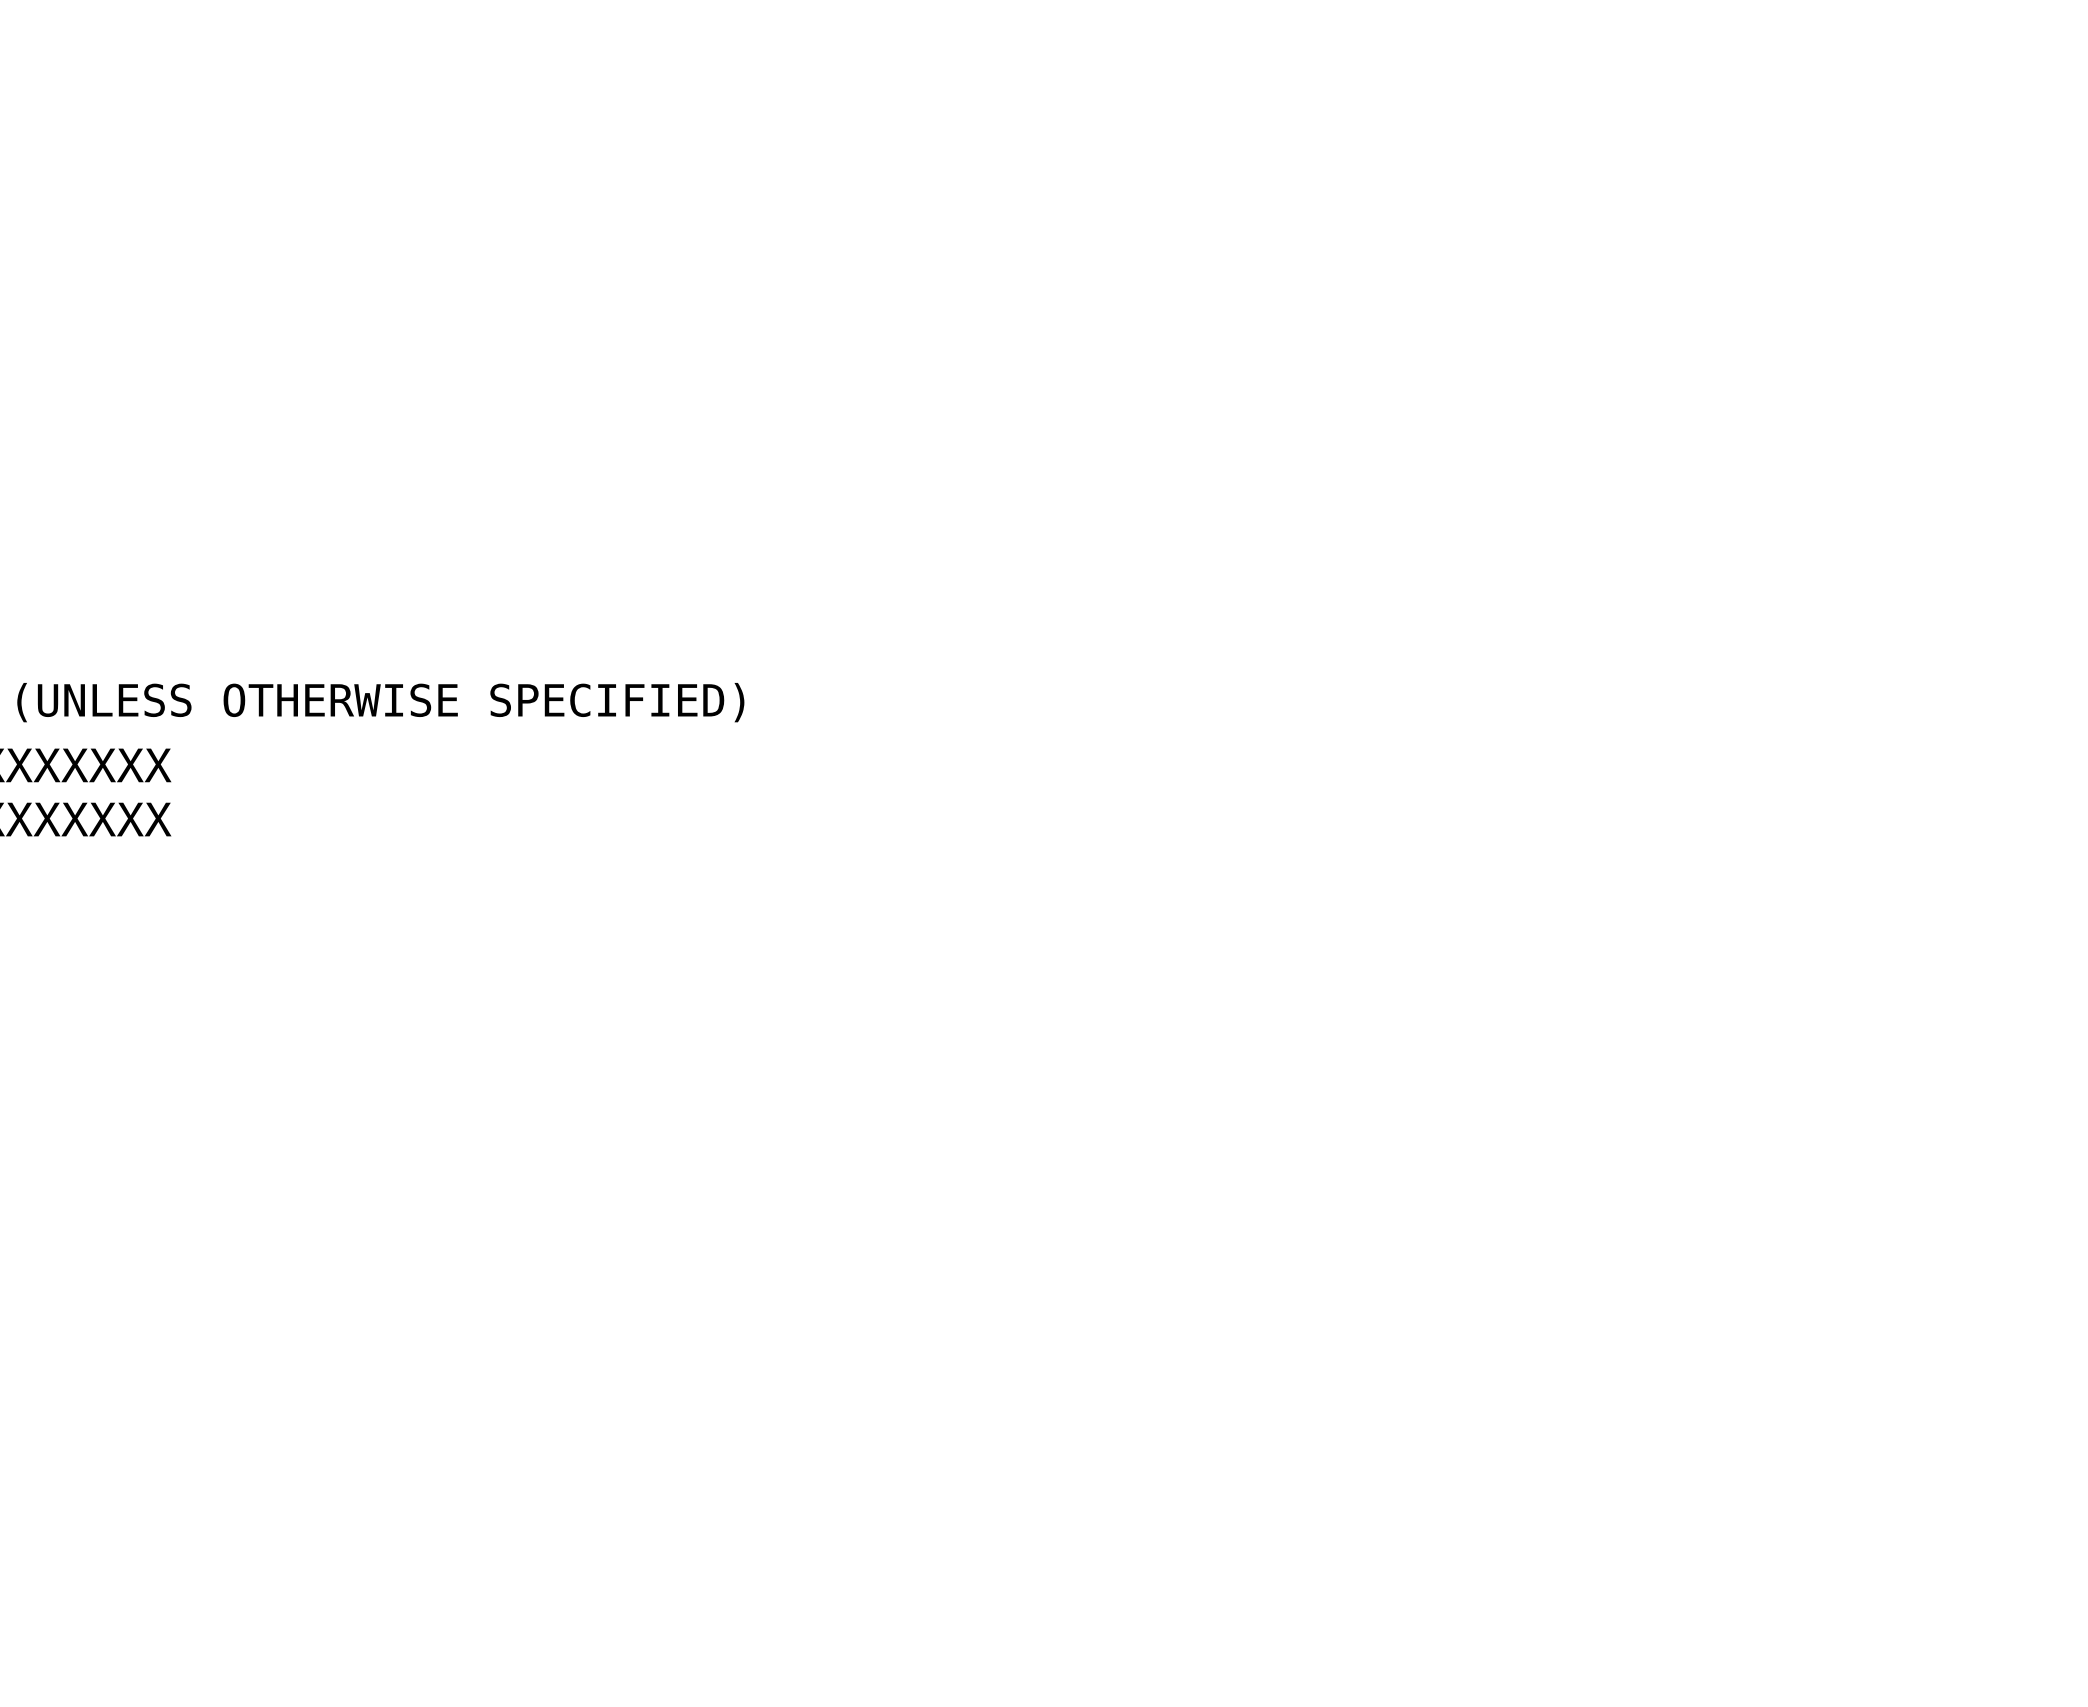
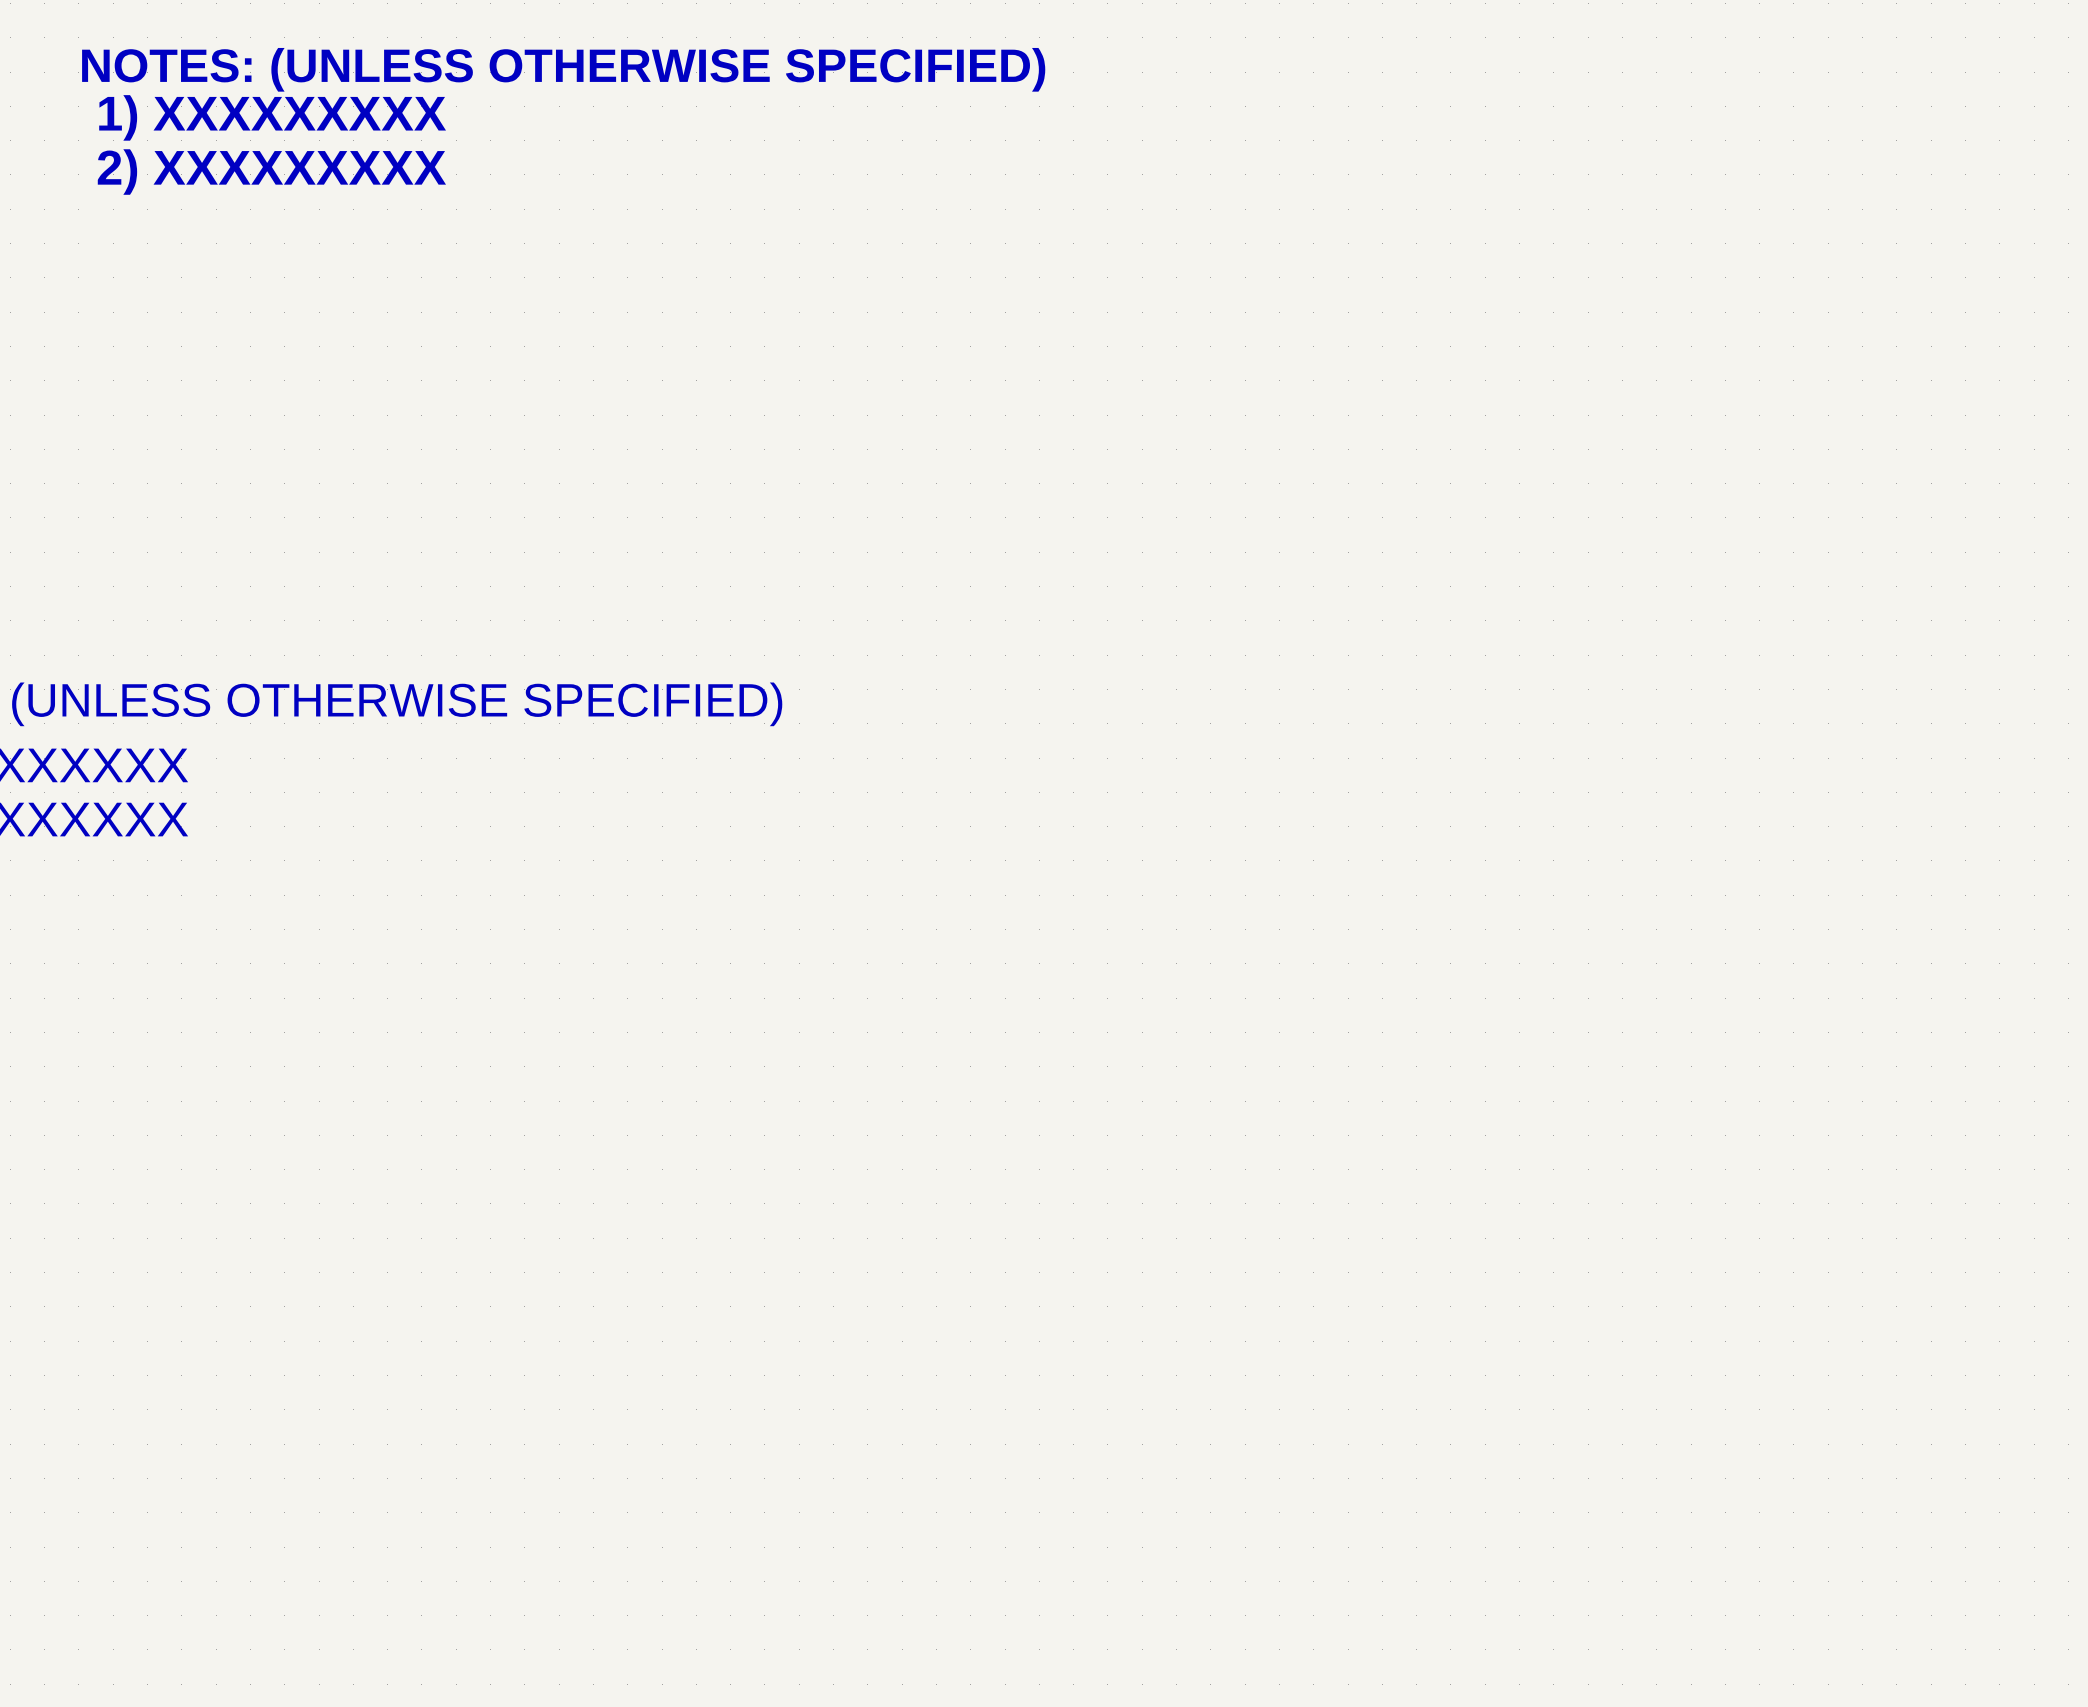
text: none -> NOTES: (UNLESS OTHERWISE SPECIFIED) (563, 69)
text: none -> 1) XXXXXXXXX (272, 117)
text: none -> 2) XXXXXXXXX (271, 172)

